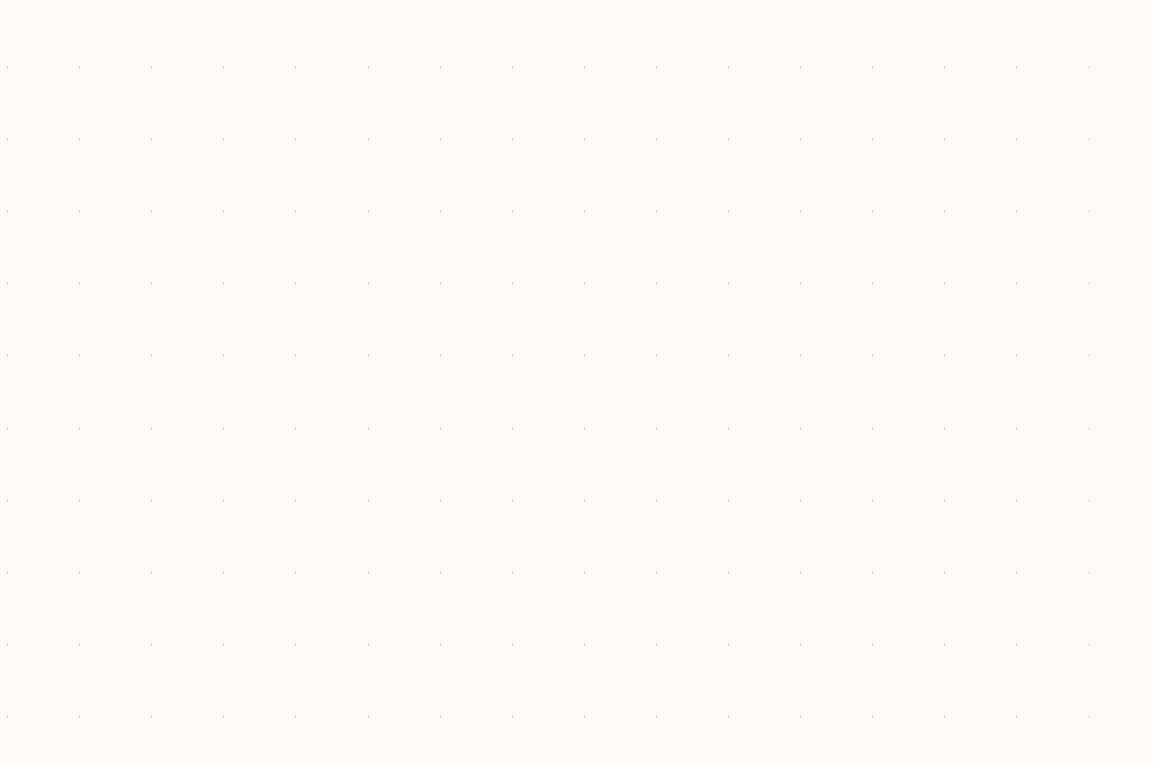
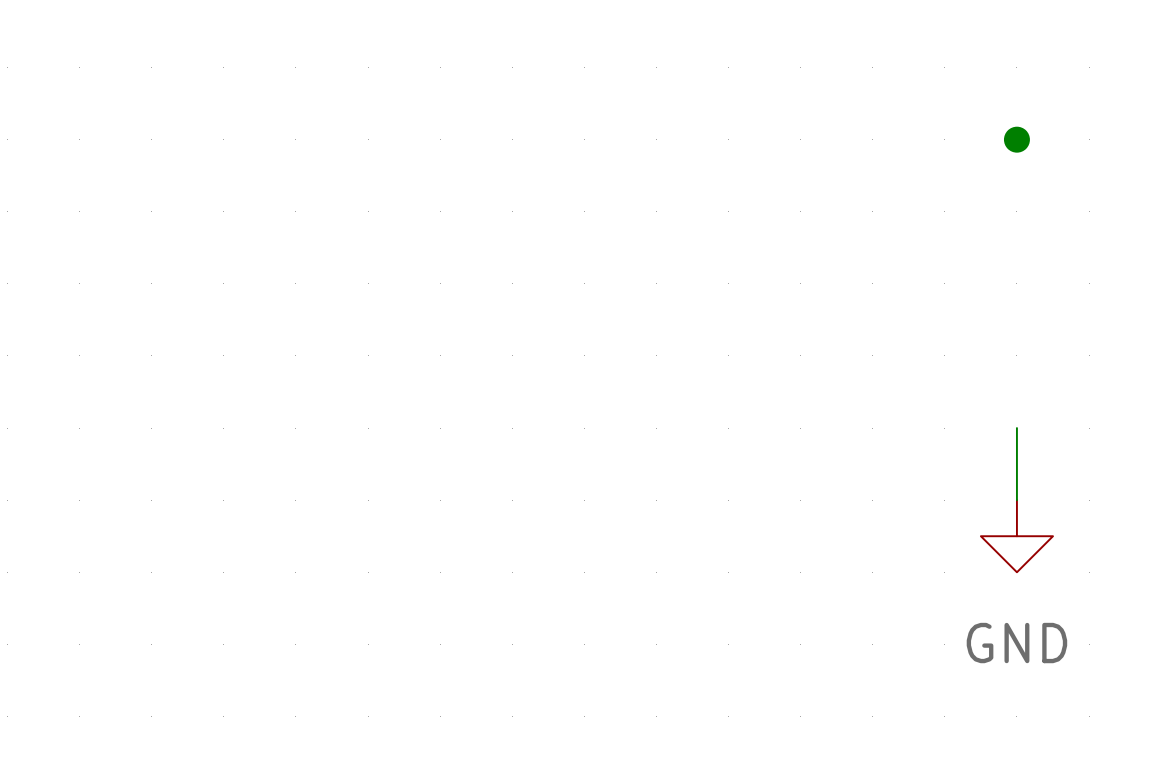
junction: none -> (1016, 139)
wire: none -> (1016, 428) (1016, 500)
power symbol: none -> GND (1016, 536)

